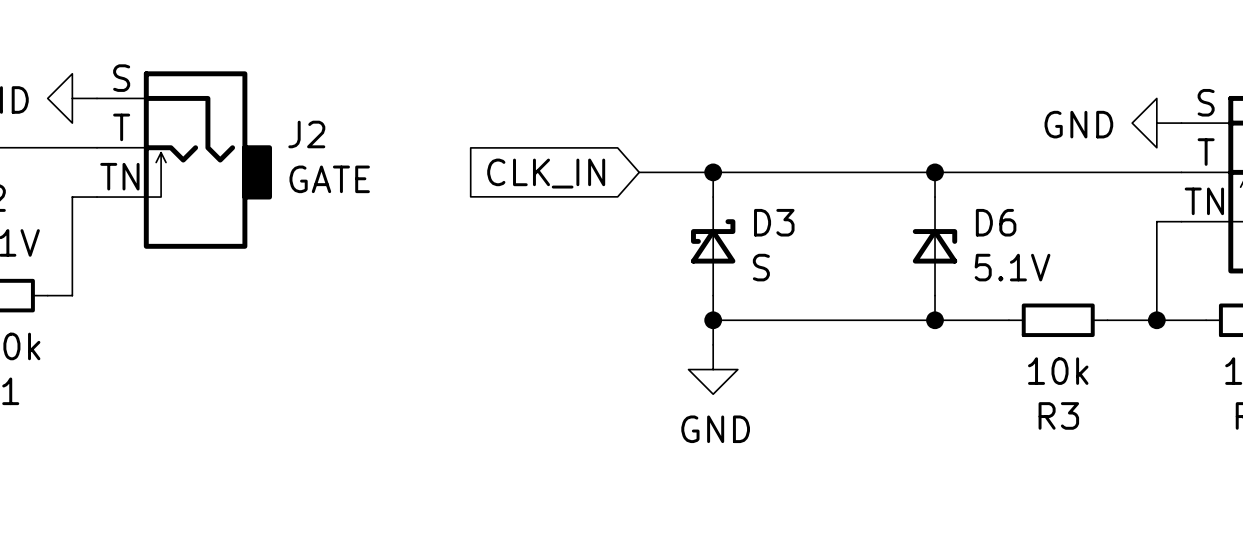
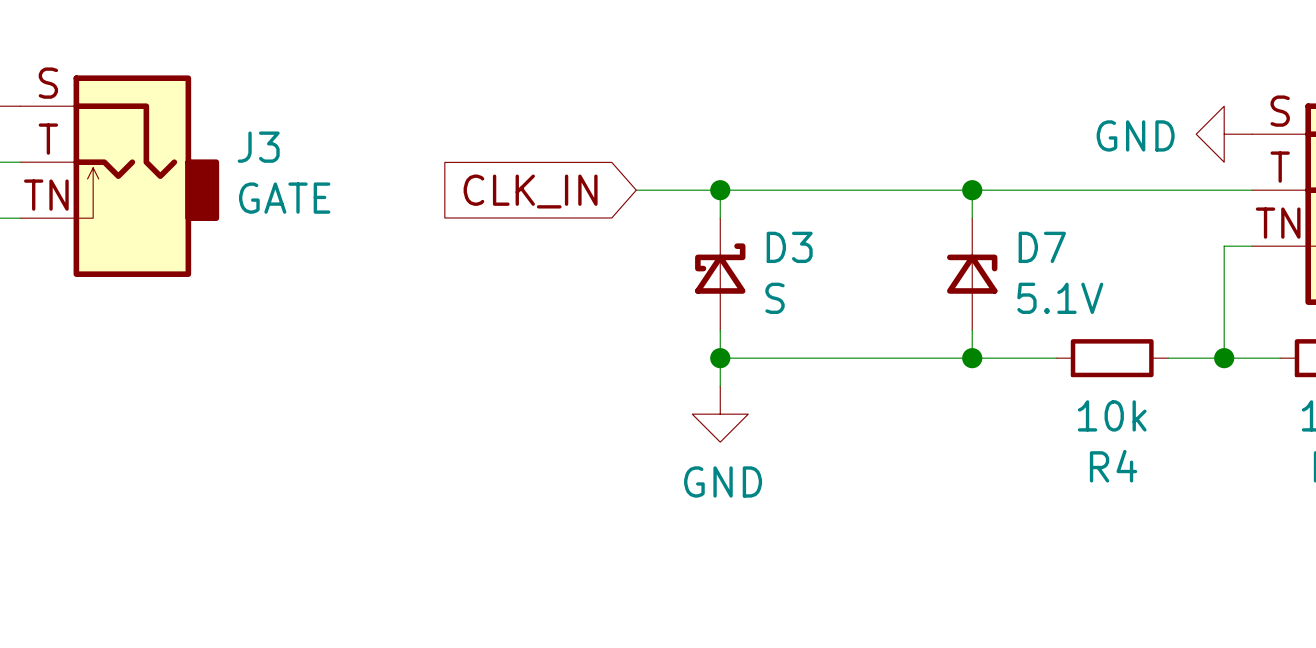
J2 name: J2 (306, 134) -> J3 (258, 147)
D6 name: D6 (996, 222) -> D7 (1042, 247)
R3 name: R3 (1058, 415) -> R4 (1113, 466)

